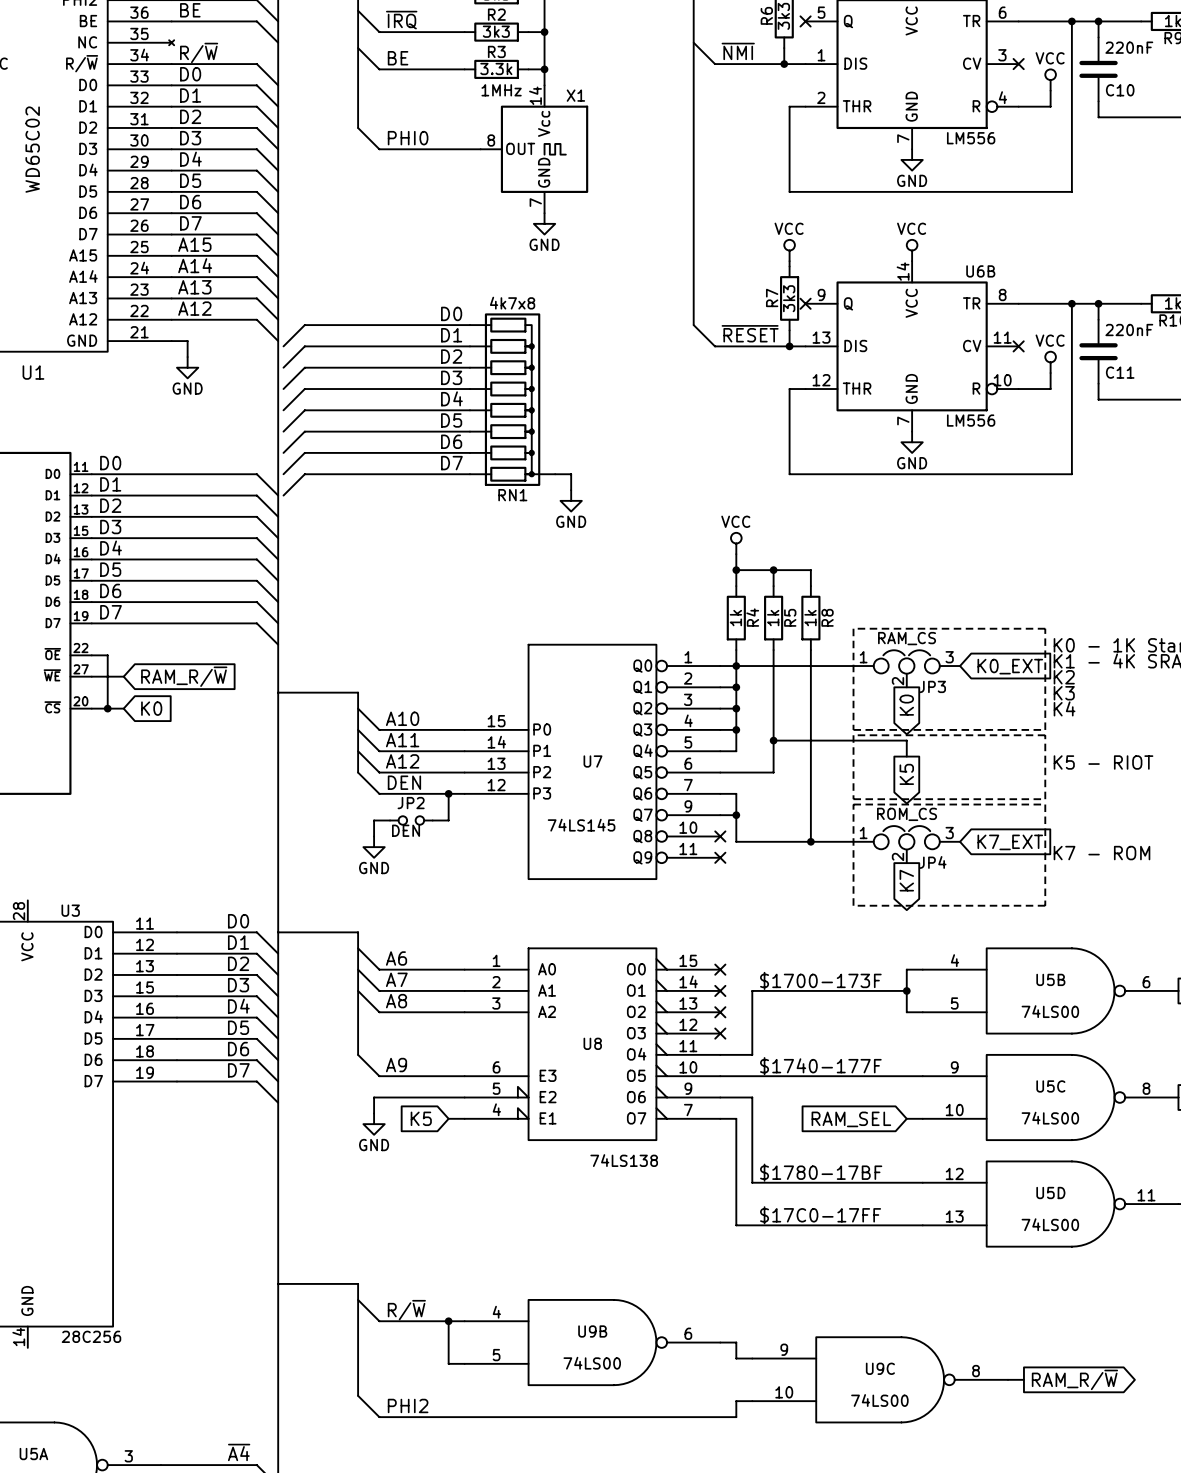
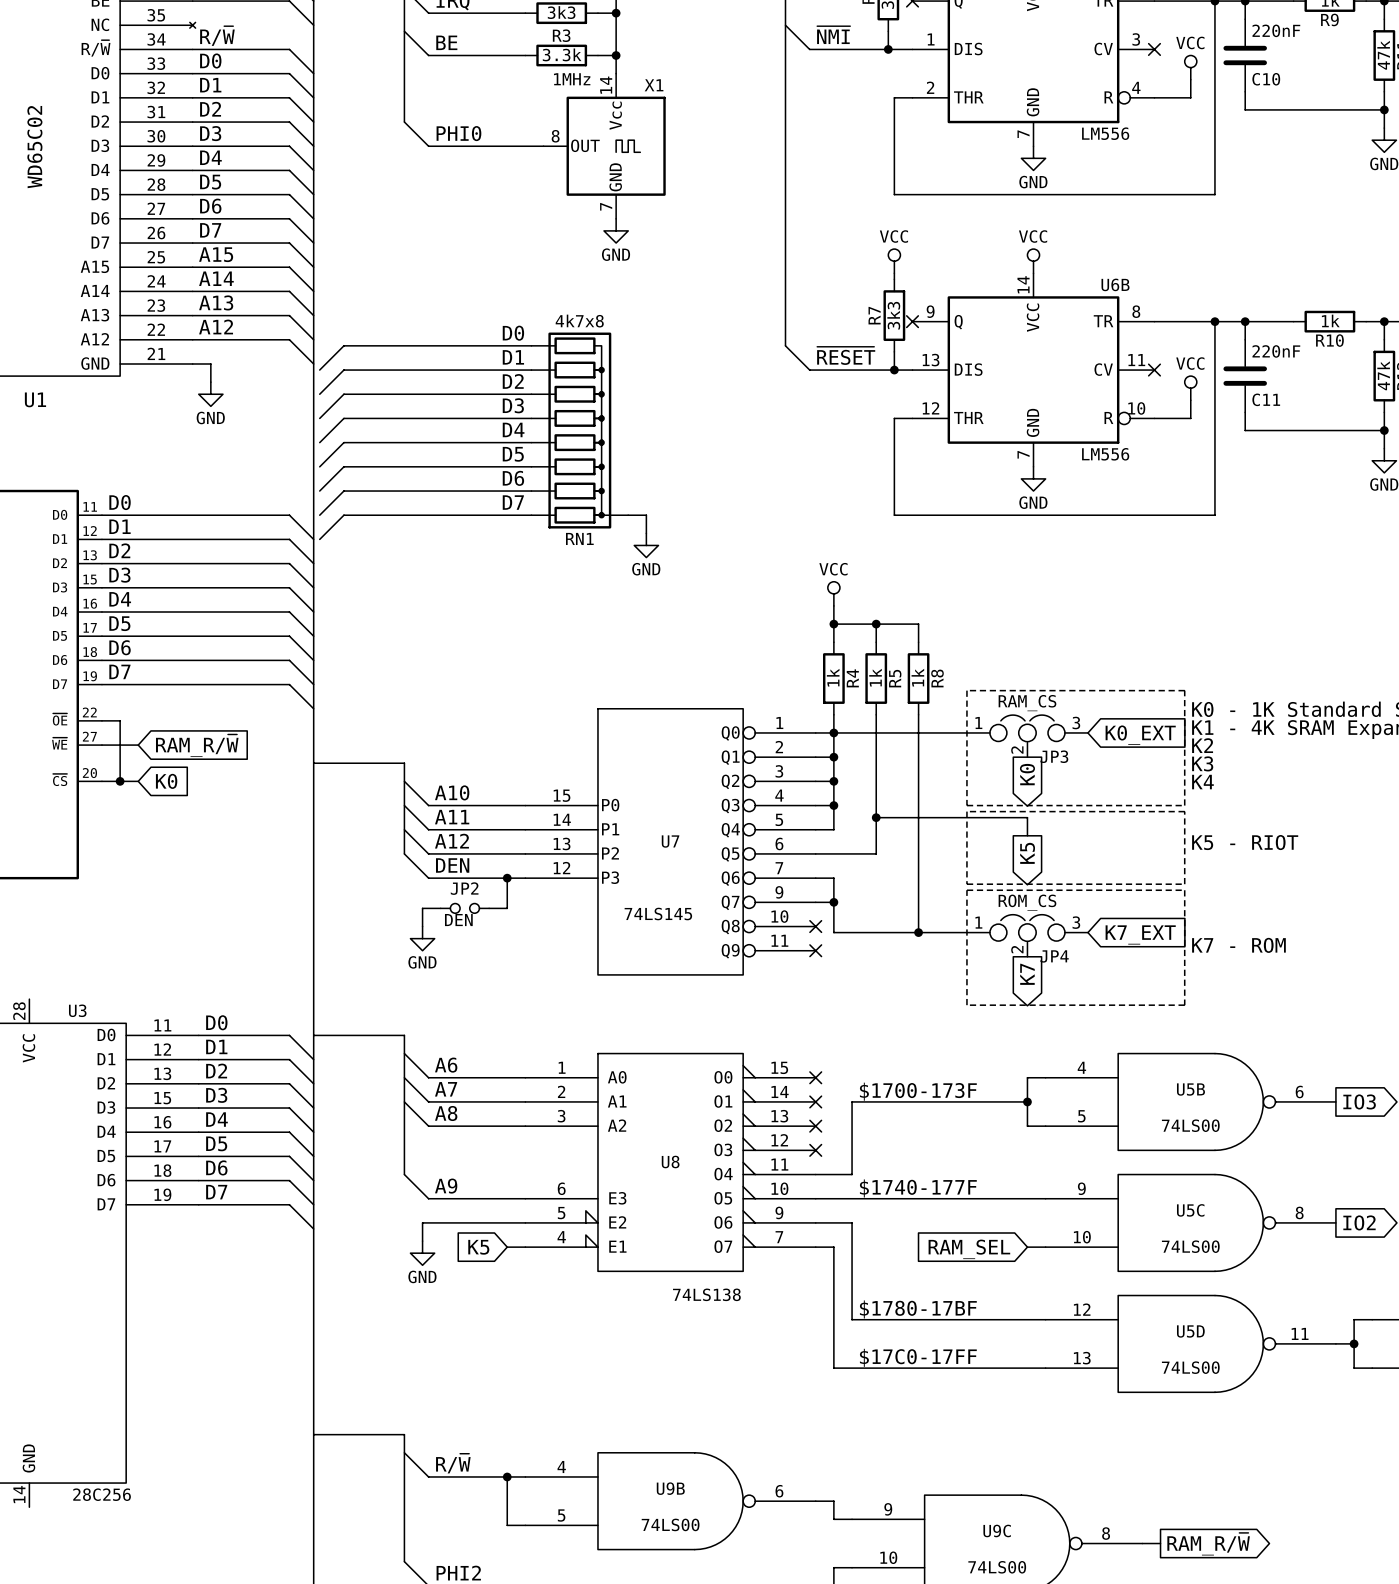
label position: D0 (238, 921) -> D0 (216, 1022)
label position: D1 (238, 942) -> D1 (216, 1046)
label position: D2 (238, 963) -> D2 (216, 1071)
label position: D3 (238, 985) -> D3 (216, 1095)
label position: D4 (238, 1006) -> D4 (216, 1119)
label position: D5 (238, 1027) -> D5 (216, 1143)
label position: D6 (238, 1049) -> D6 (216, 1167)
label position: D7 (238, 1070) -> D7 (216, 1192)

